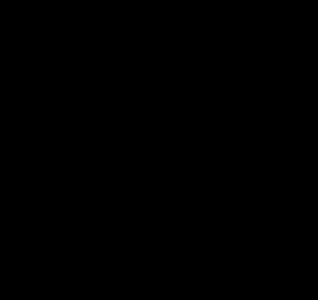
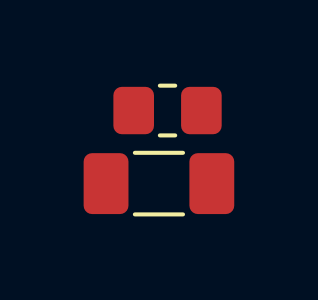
part: none -> (167, 110)
part: none -> (158, 183)

